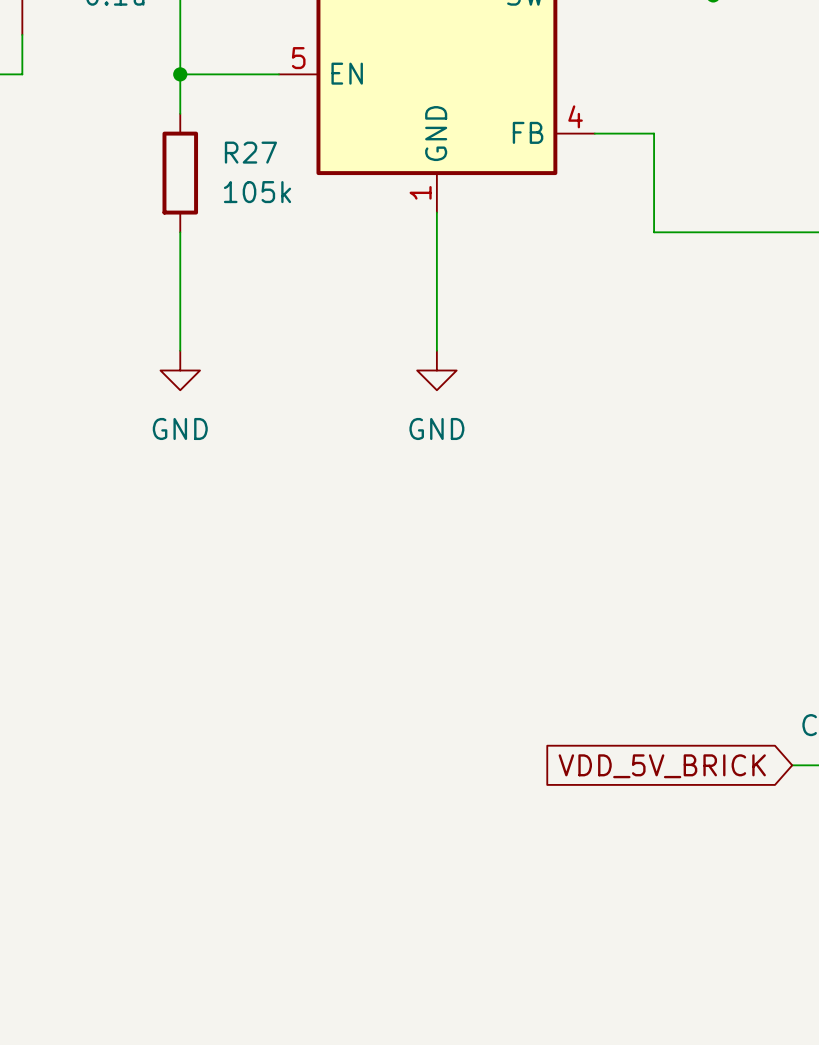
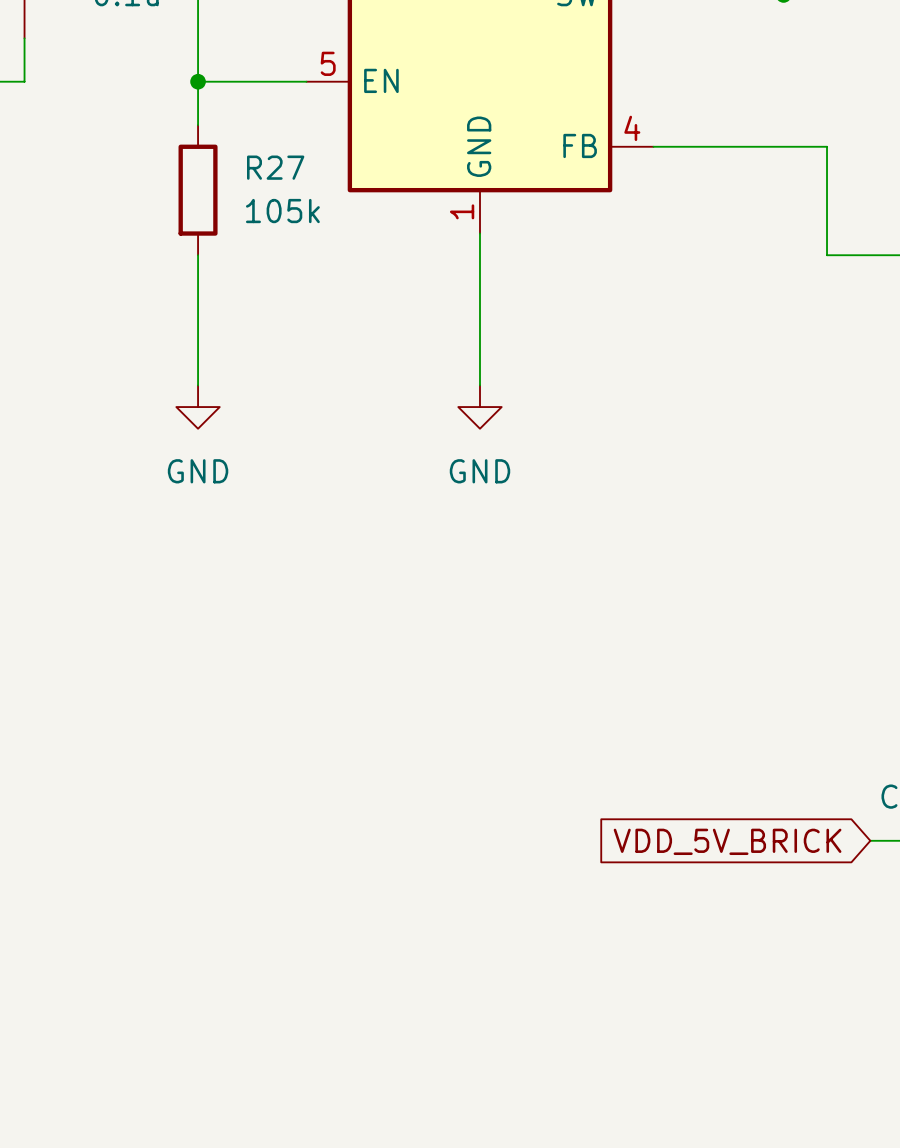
wire: (654, 133) (654, 232) (752, 232) -> (718, 146) (827, 146) (827, 255)

